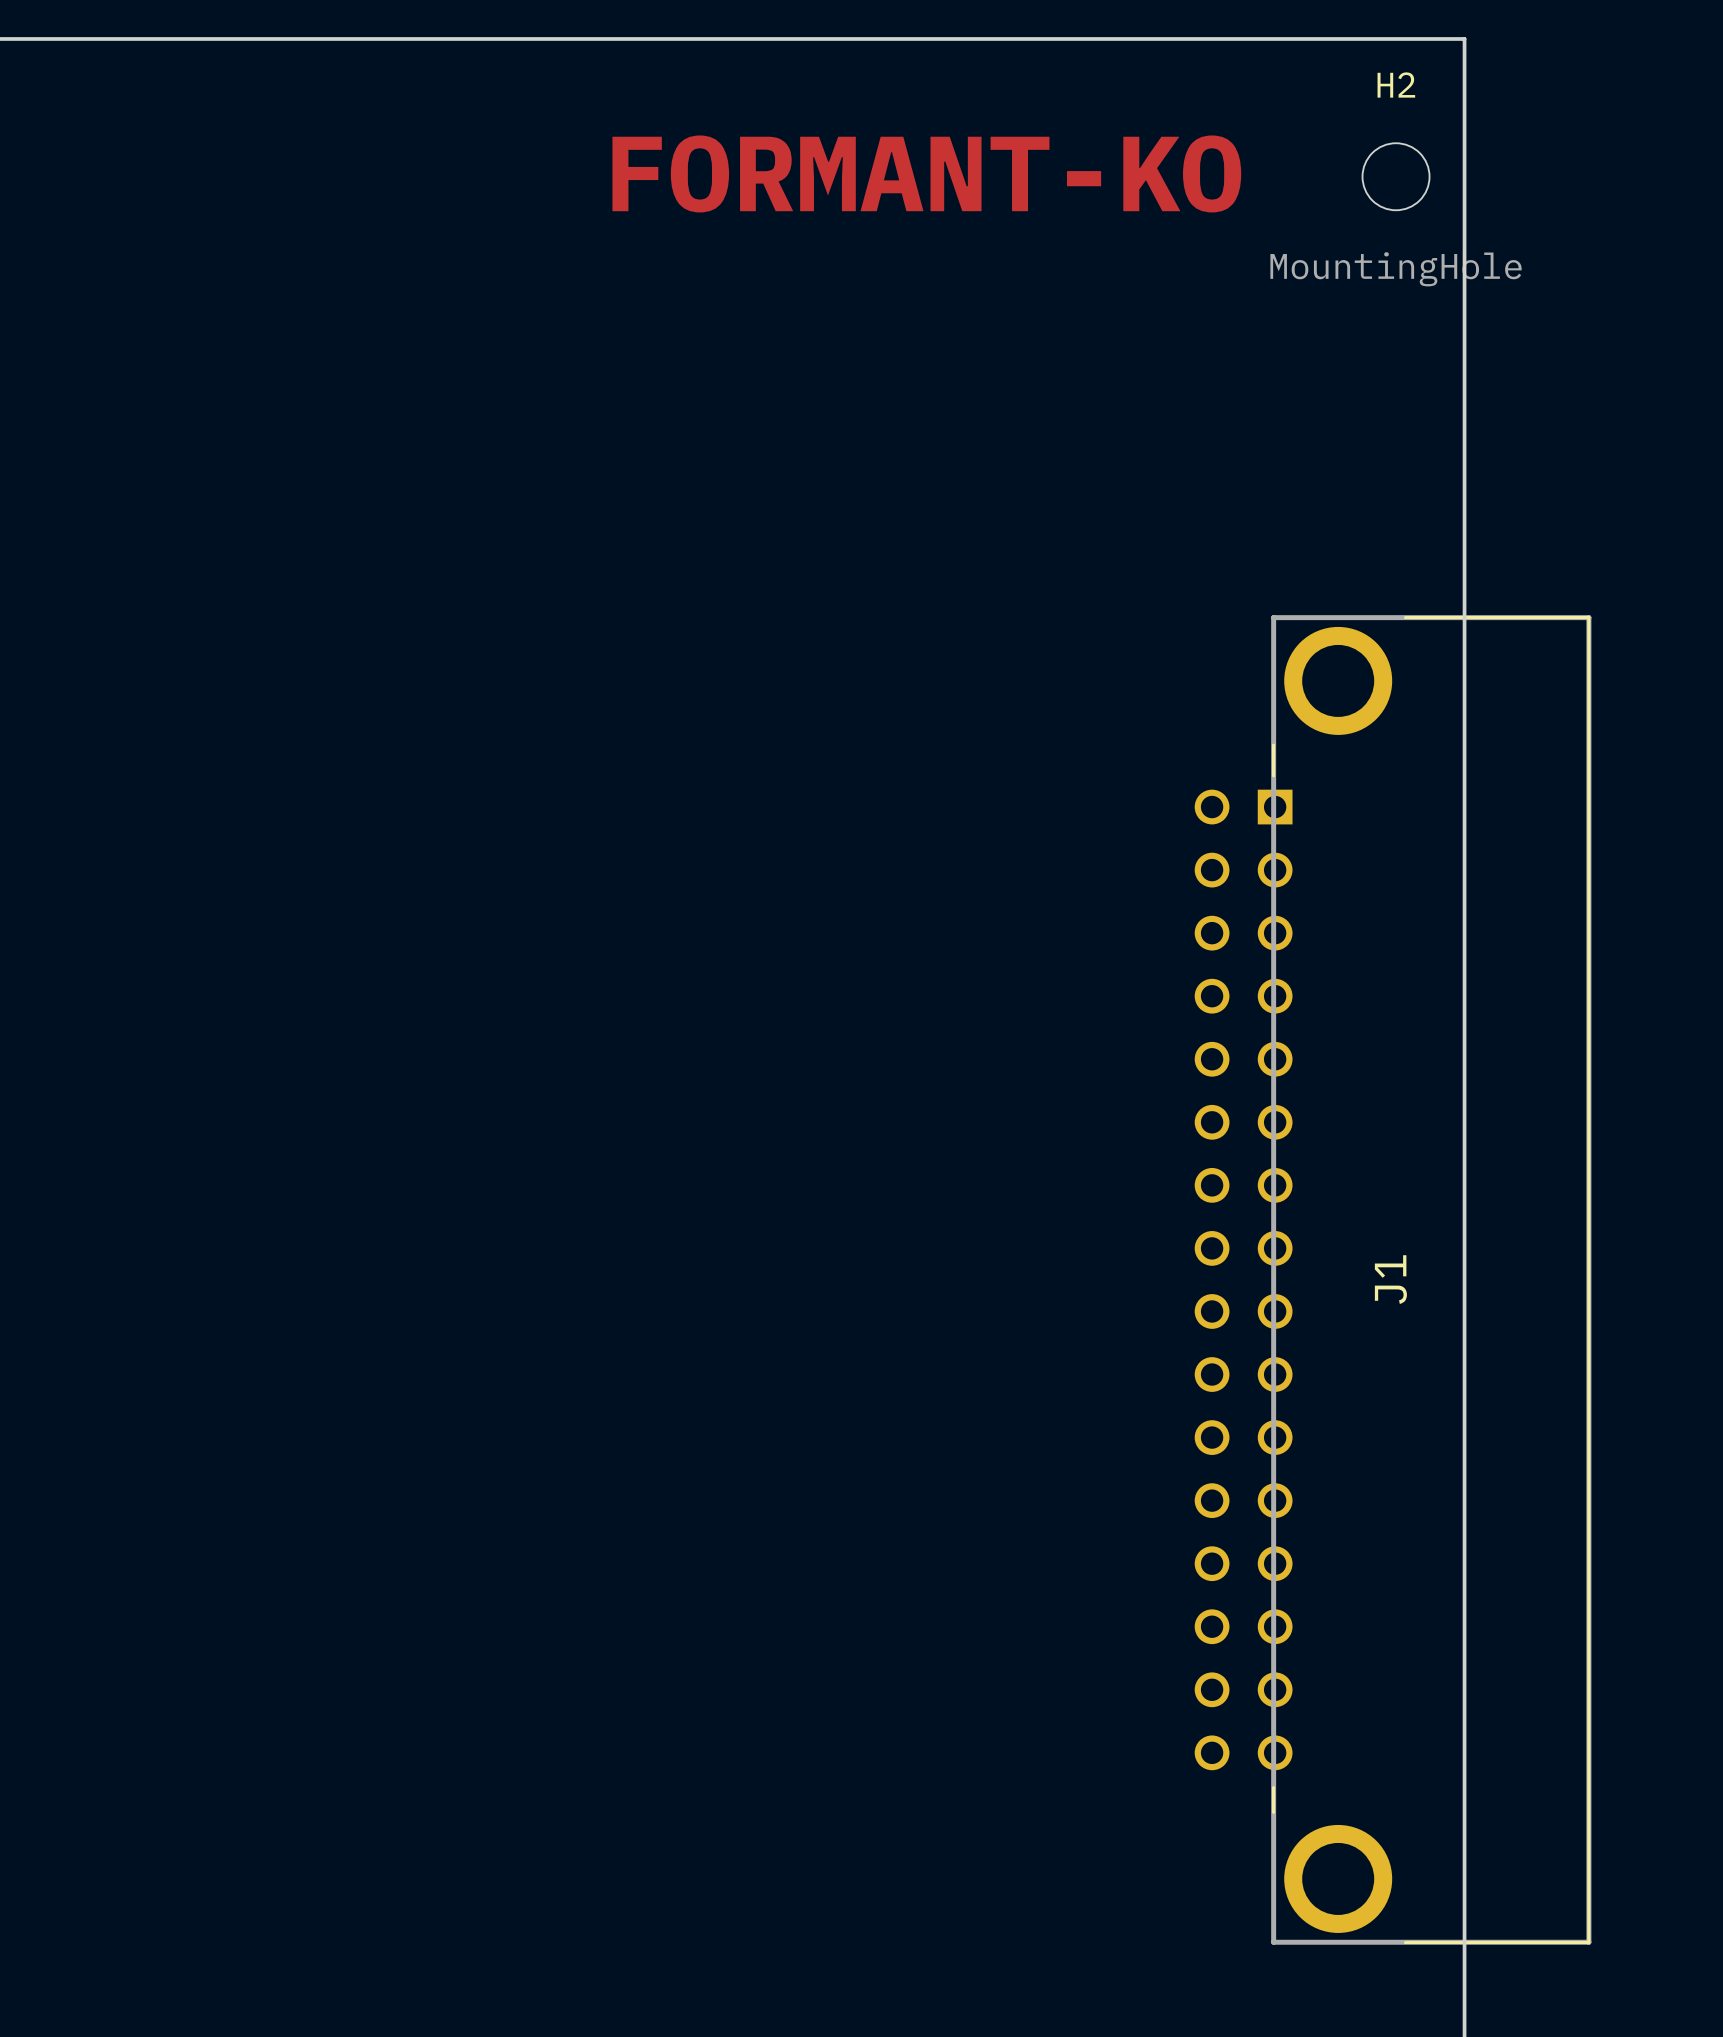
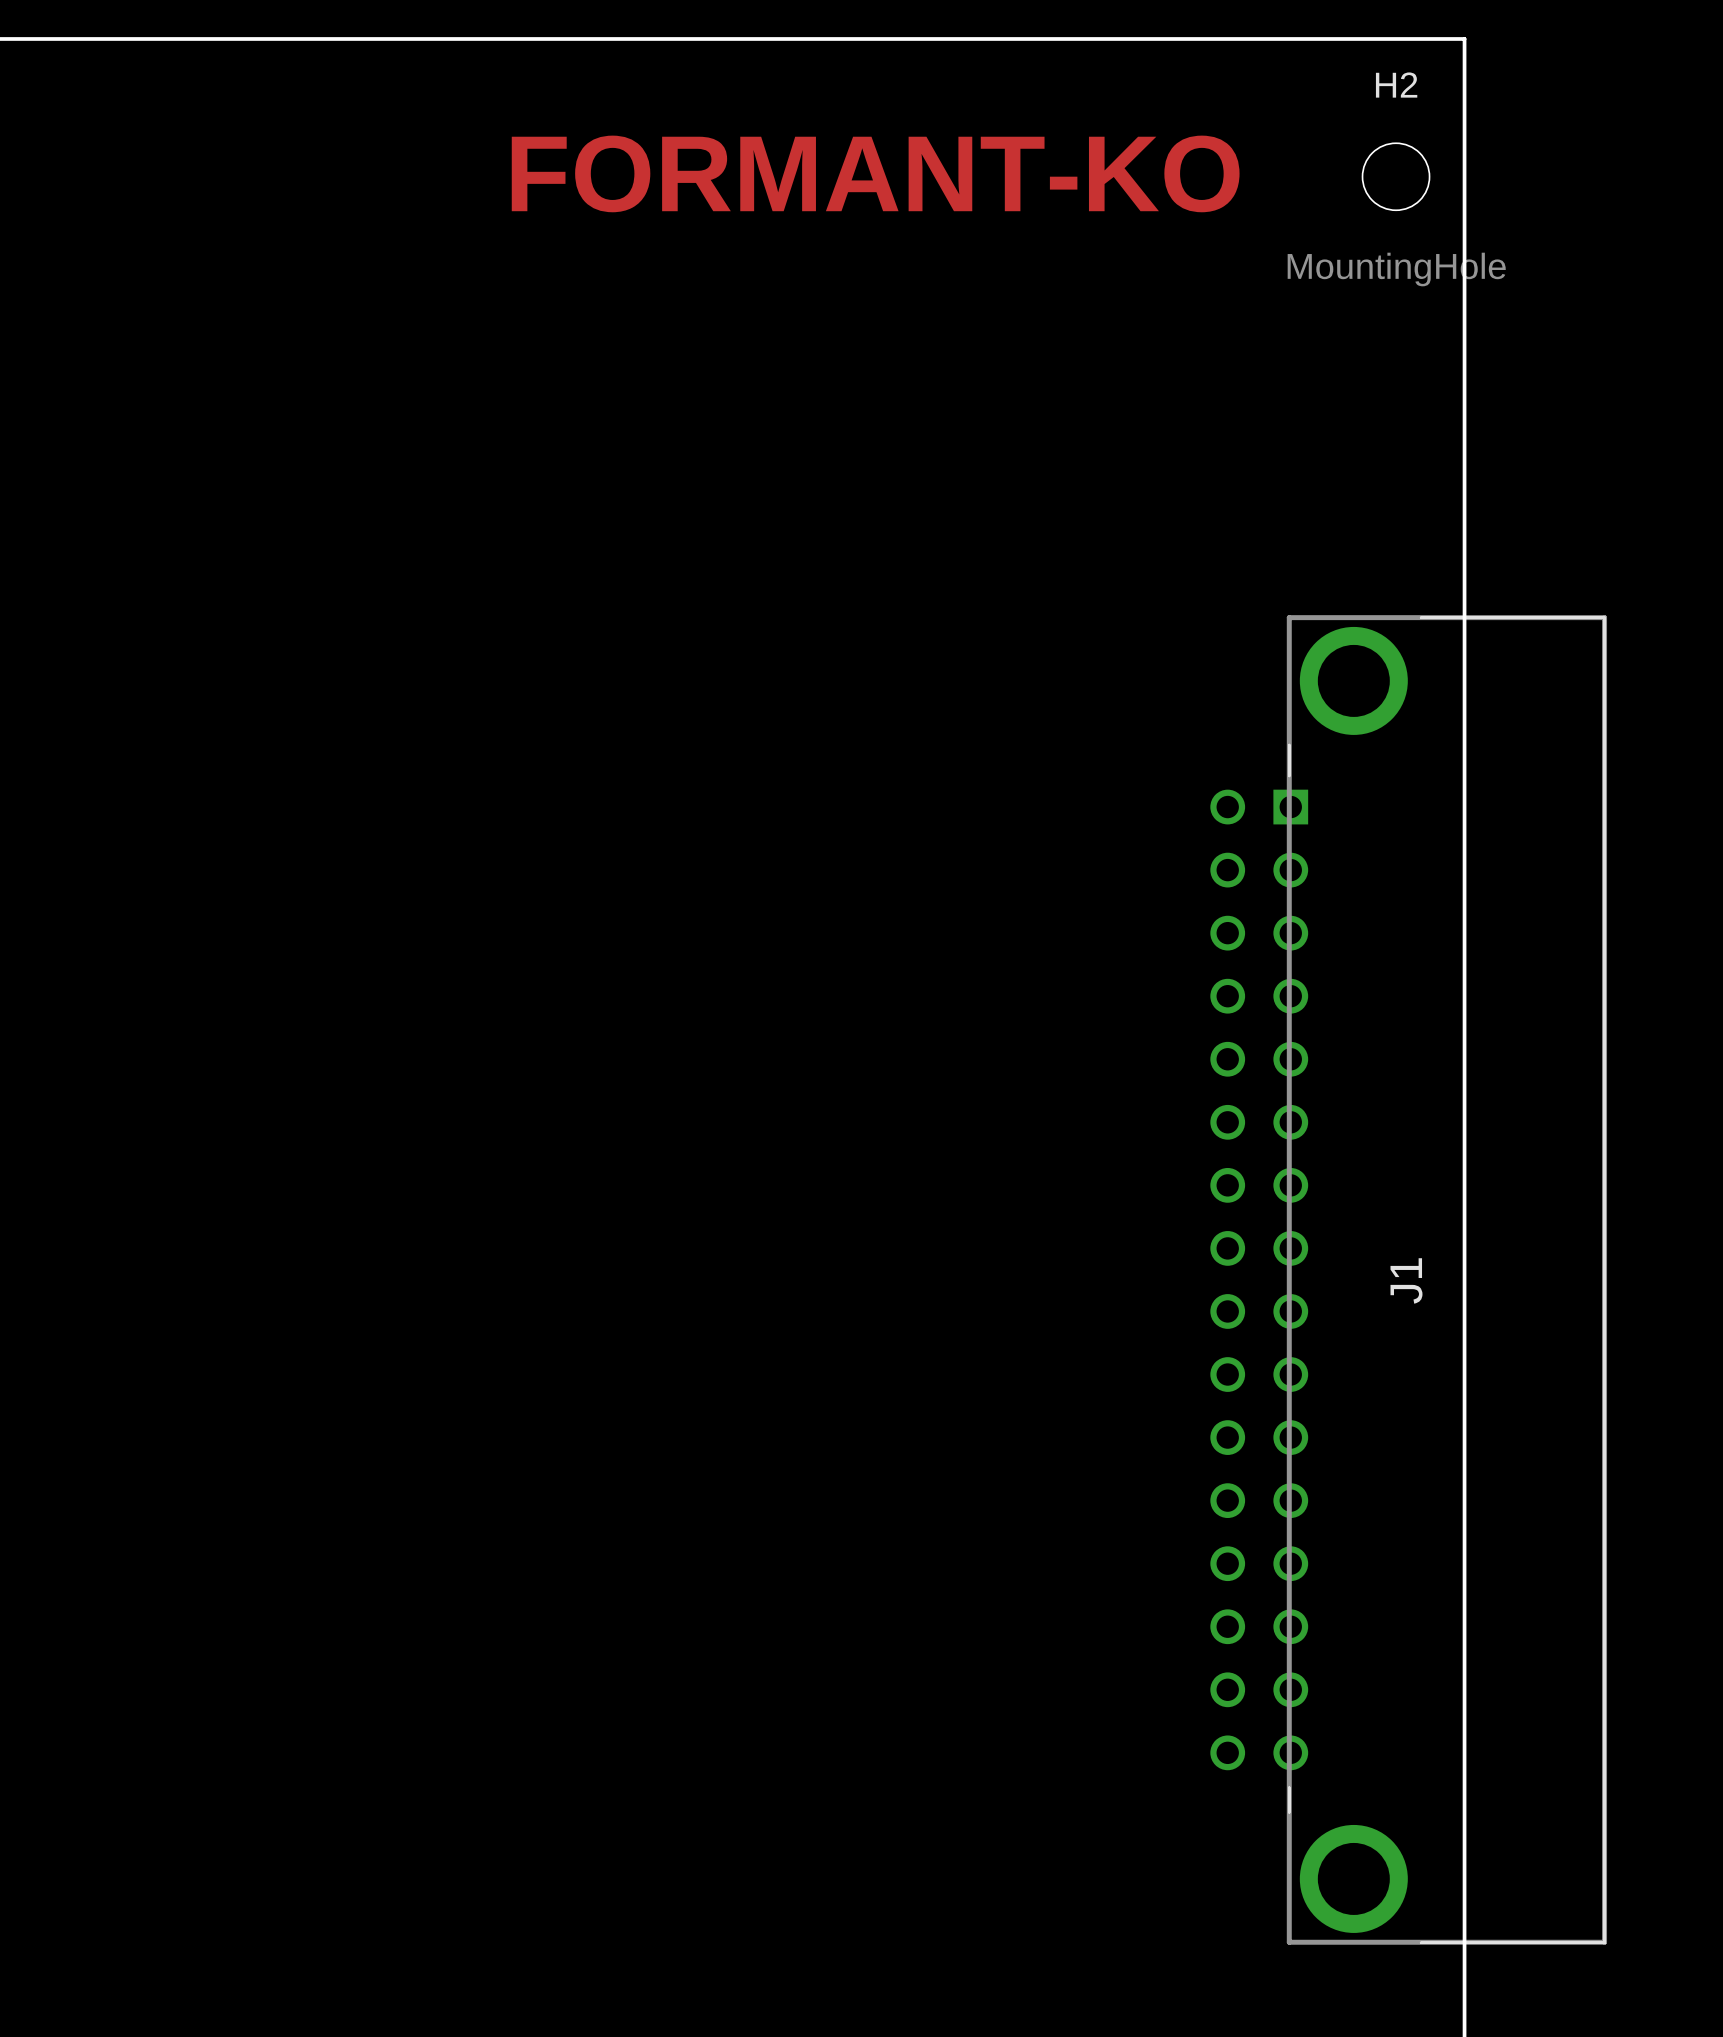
J1 position: (1393, 1279) -> (1408, 1279)

